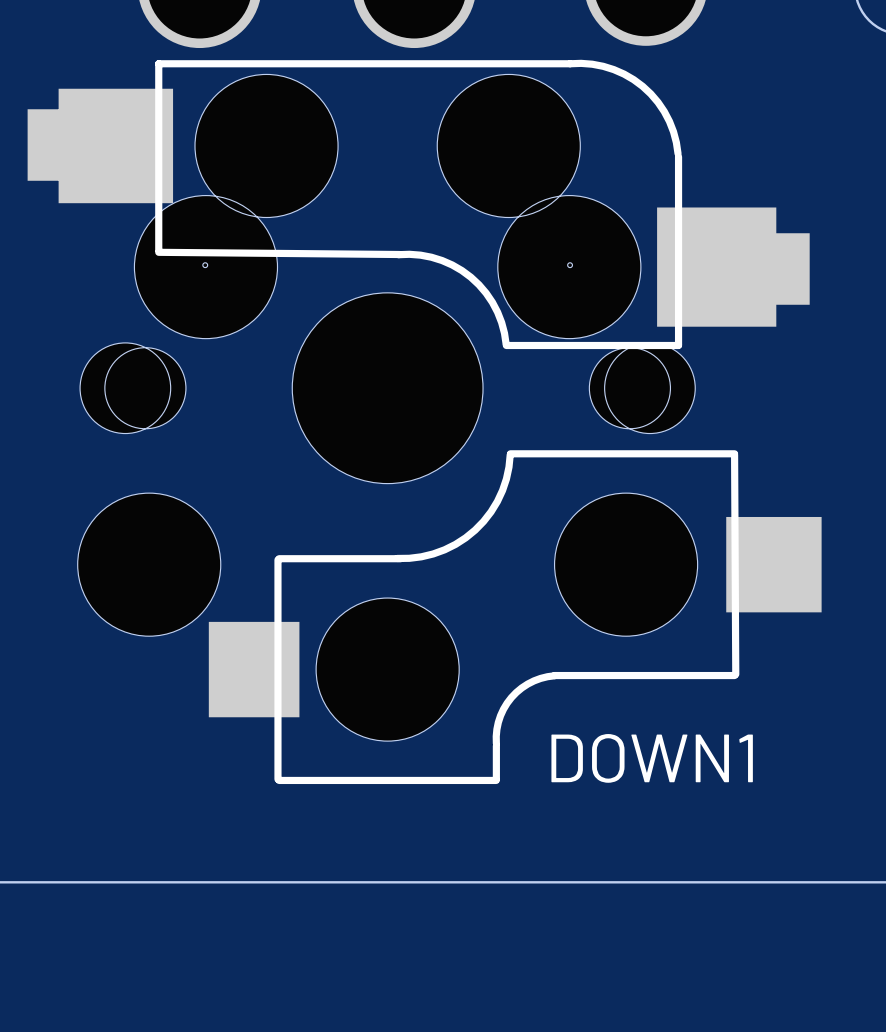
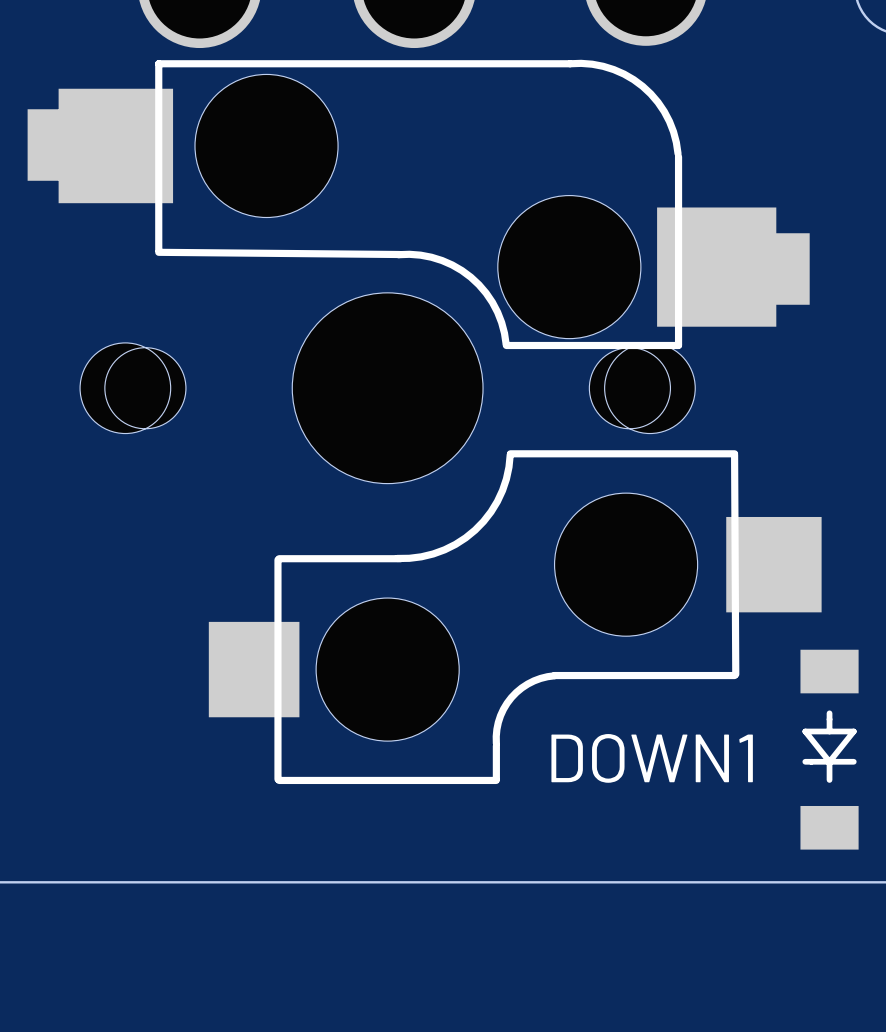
DOWN1 footprint: [27, 59, 822, 785] -> [27, 59, 822, 785]
part: none -> (829, 749)

